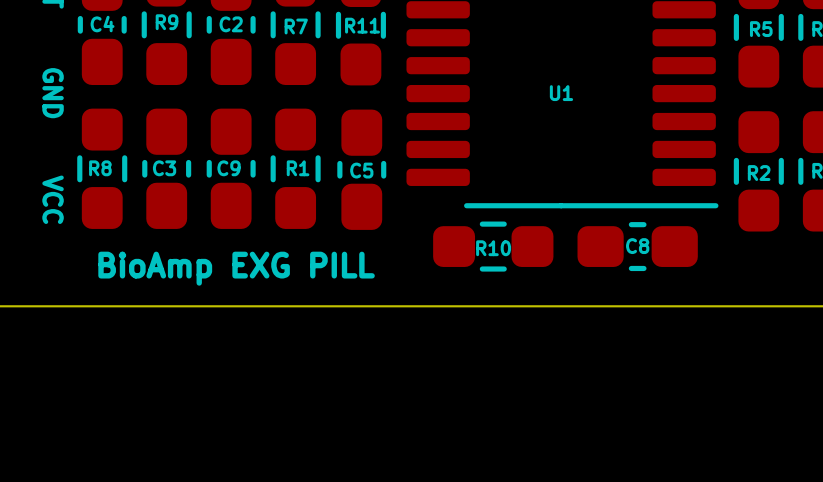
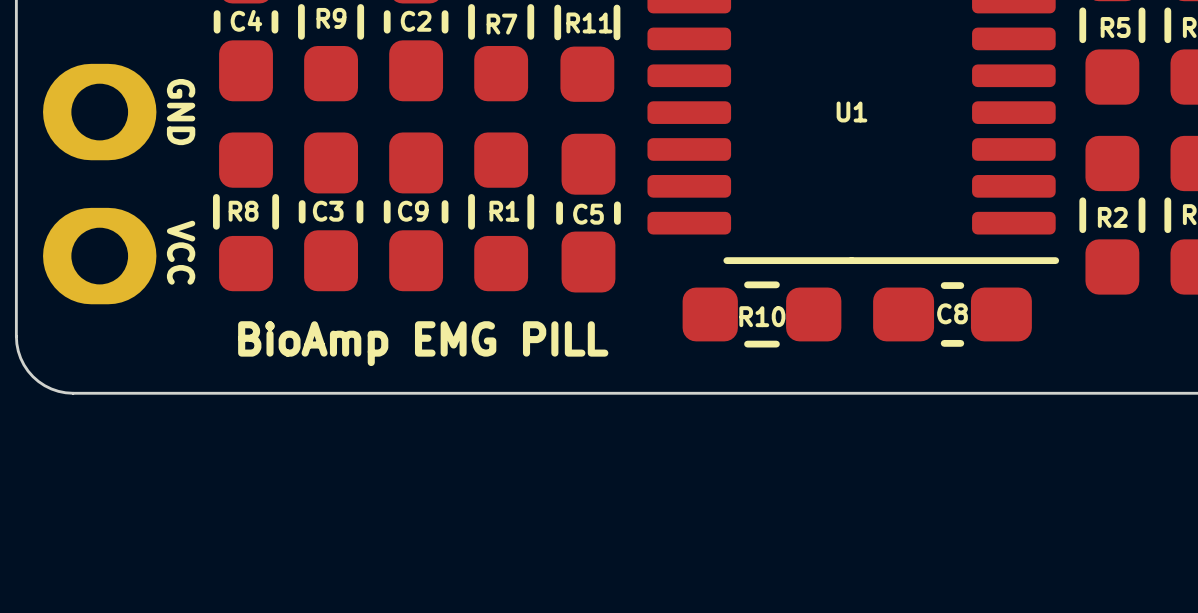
text: BioAmp EXG PILL (236, 268) -> BioAmp EMG PILL (423, 343)

